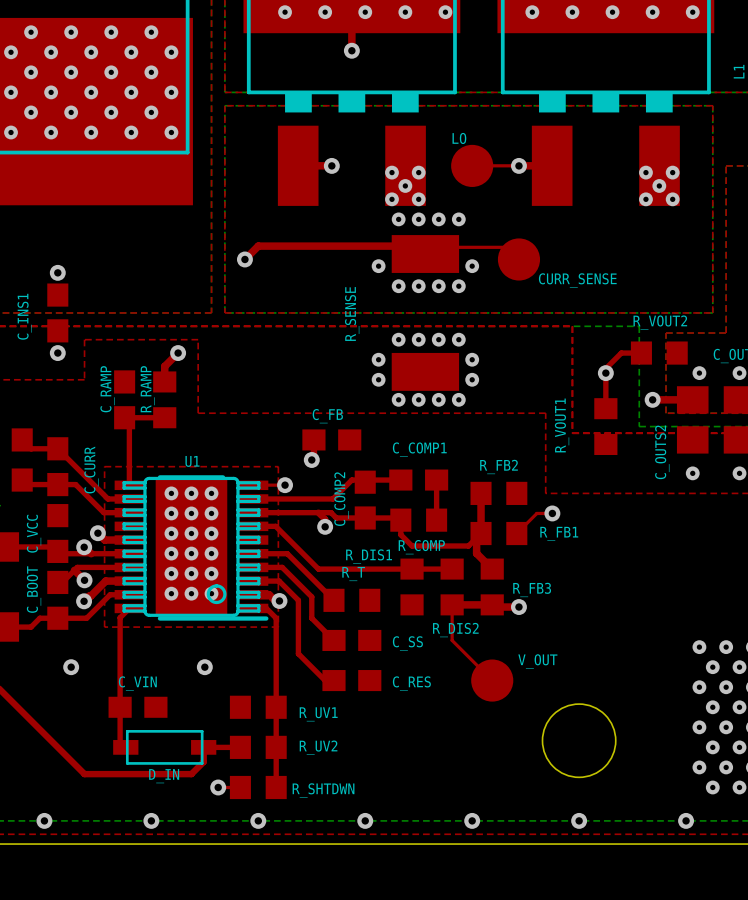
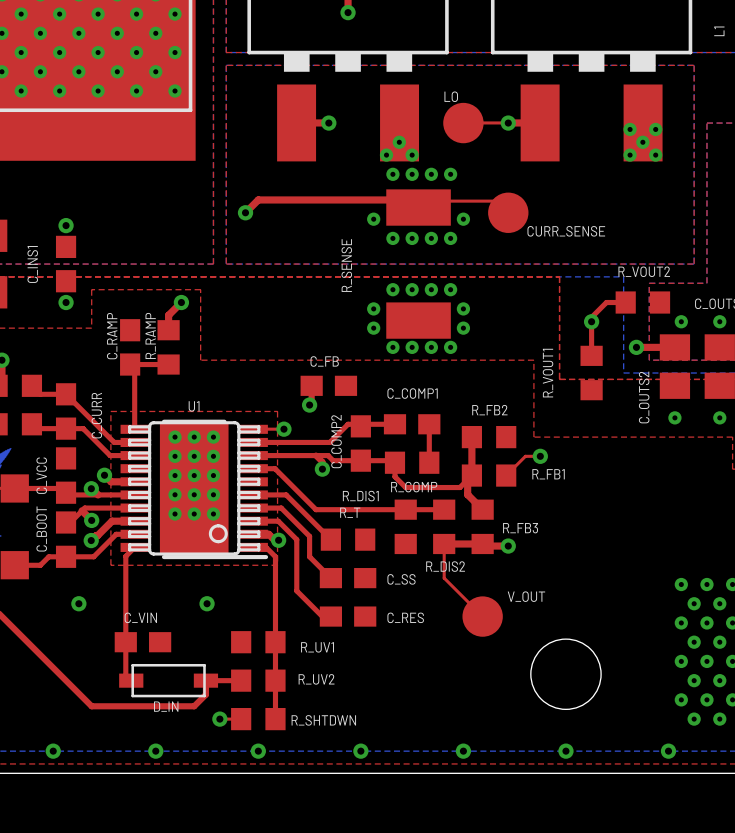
via: (391, 172) -> none
via: (418, 172) -> none
via: (171, 593) -> none
via: (191, 593) -> none
via: (211, 593) -> none

